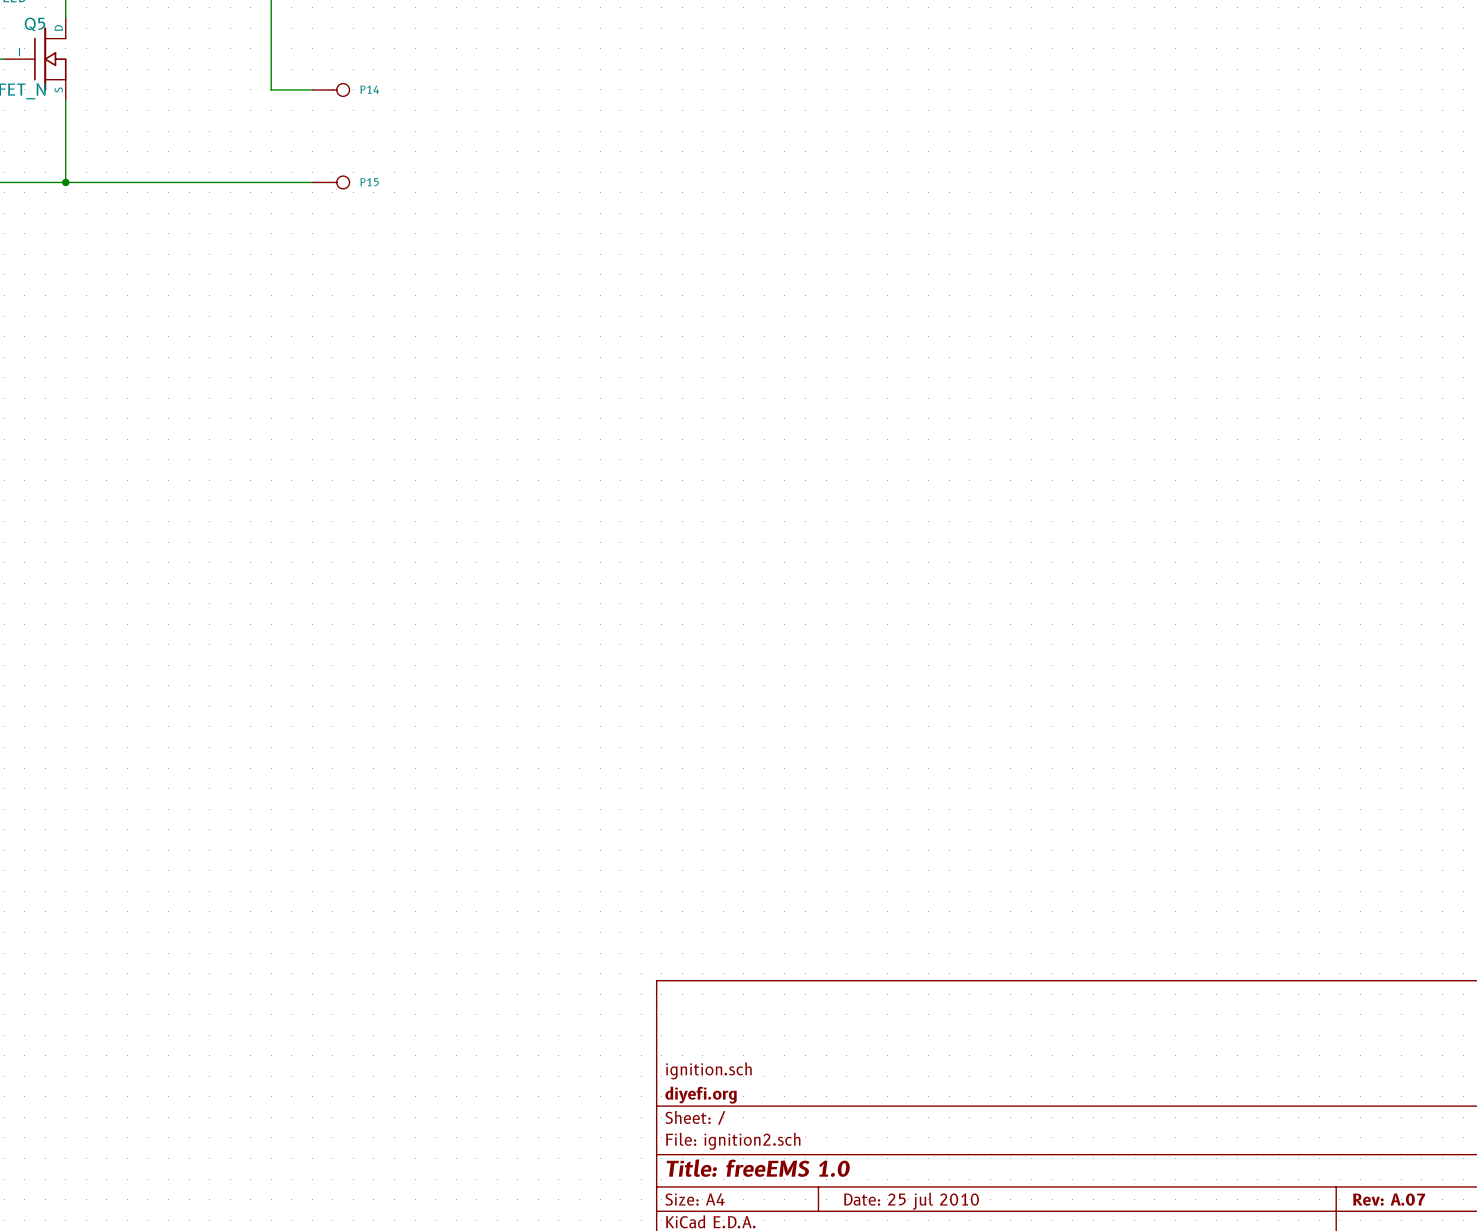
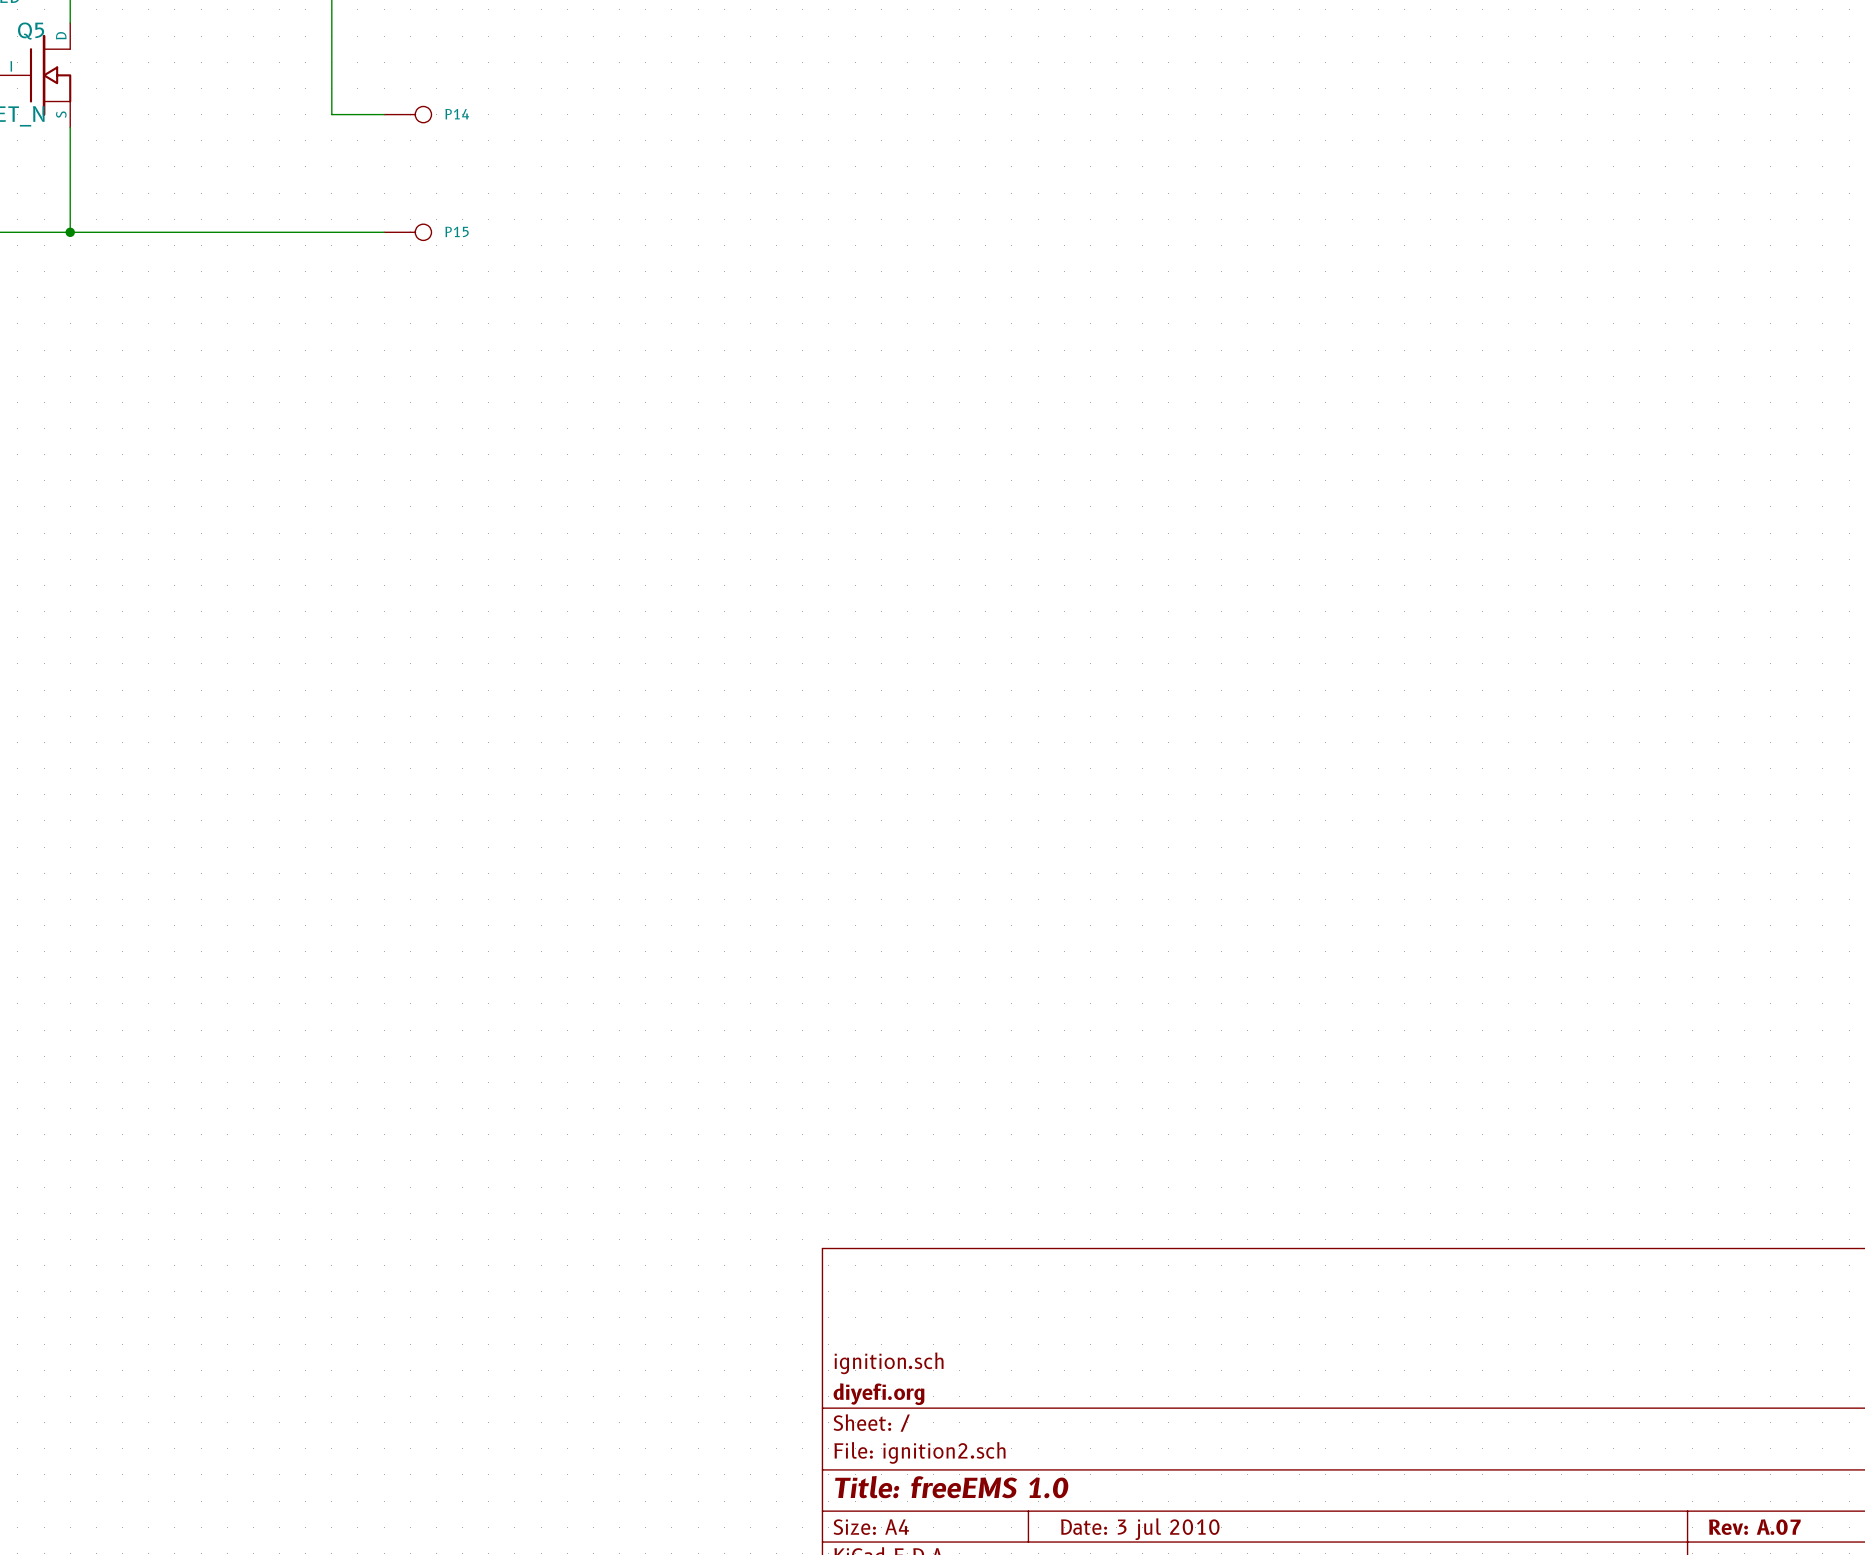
title block: Date: 25 jul 2010 (911, 1201) -> Date: 3 jul 2010 (1140, 1529)

